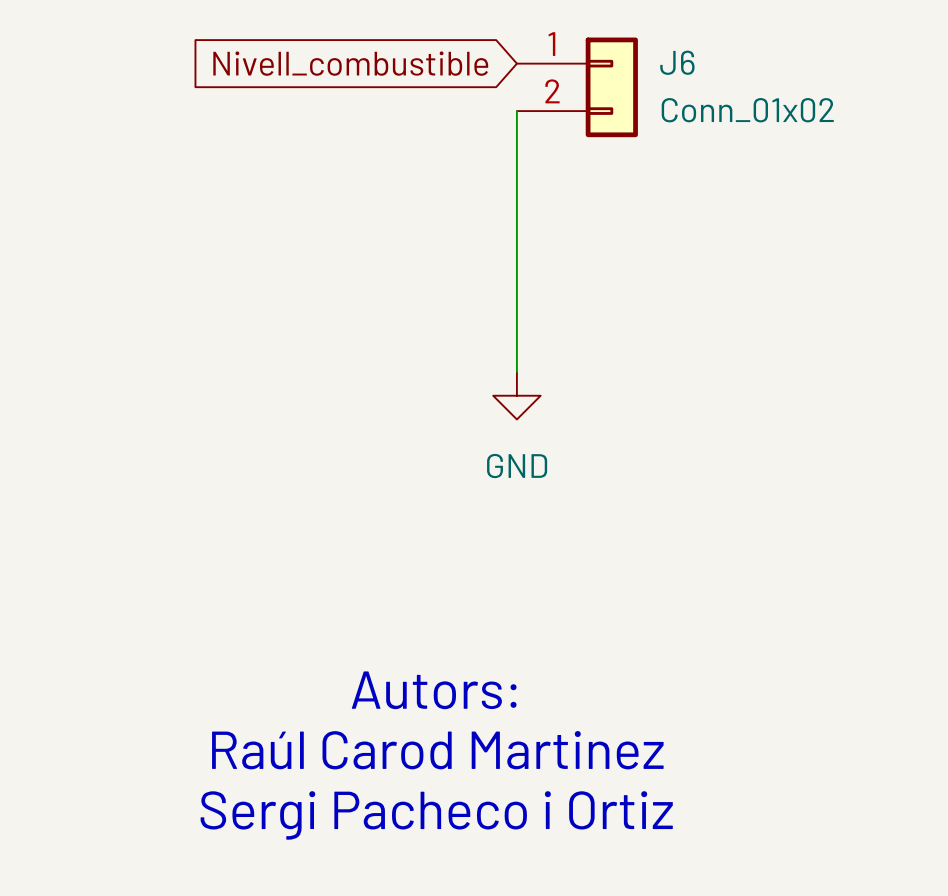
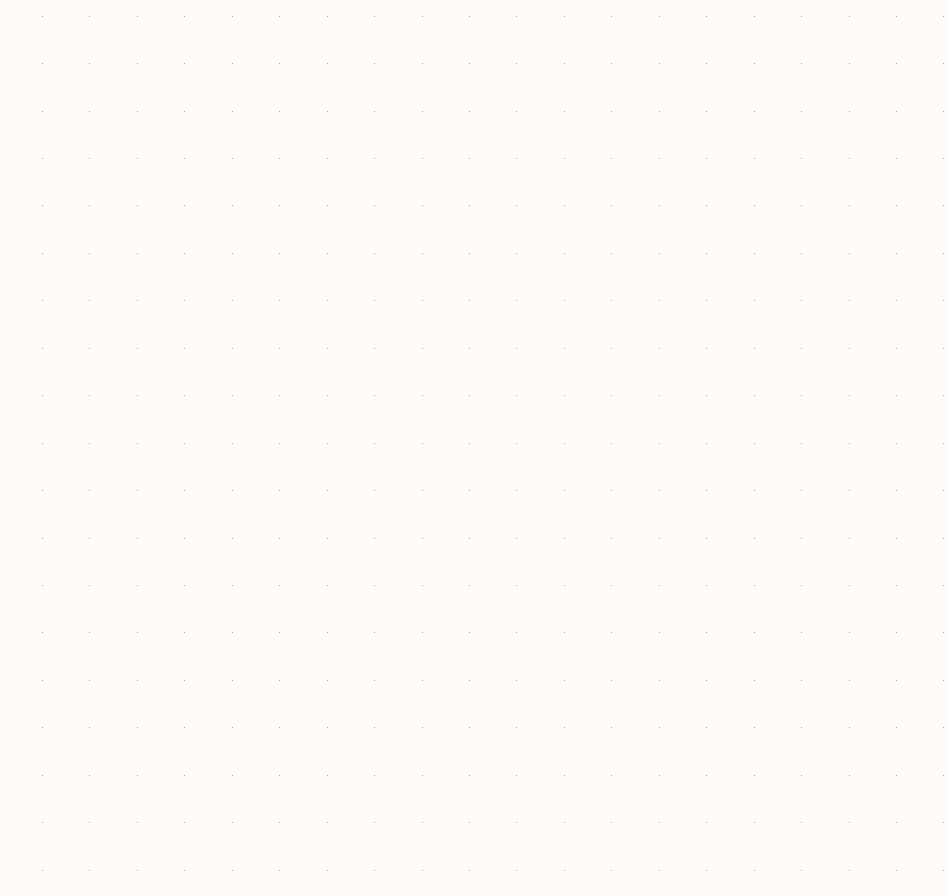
global label: Nivell_combustible (350, 63) -> none
J6: Conn_01x02 (577, 87) -> none
wire: (516, 111) (516, 372) -> none
power symbol: GND (516, 395) -> none
text: Autors: (434, 690) -> none
text: Raúl Carod Martinez (437, 750) -> none
text: Sergi Pacheco i Ortiz (436, 815) -> none

